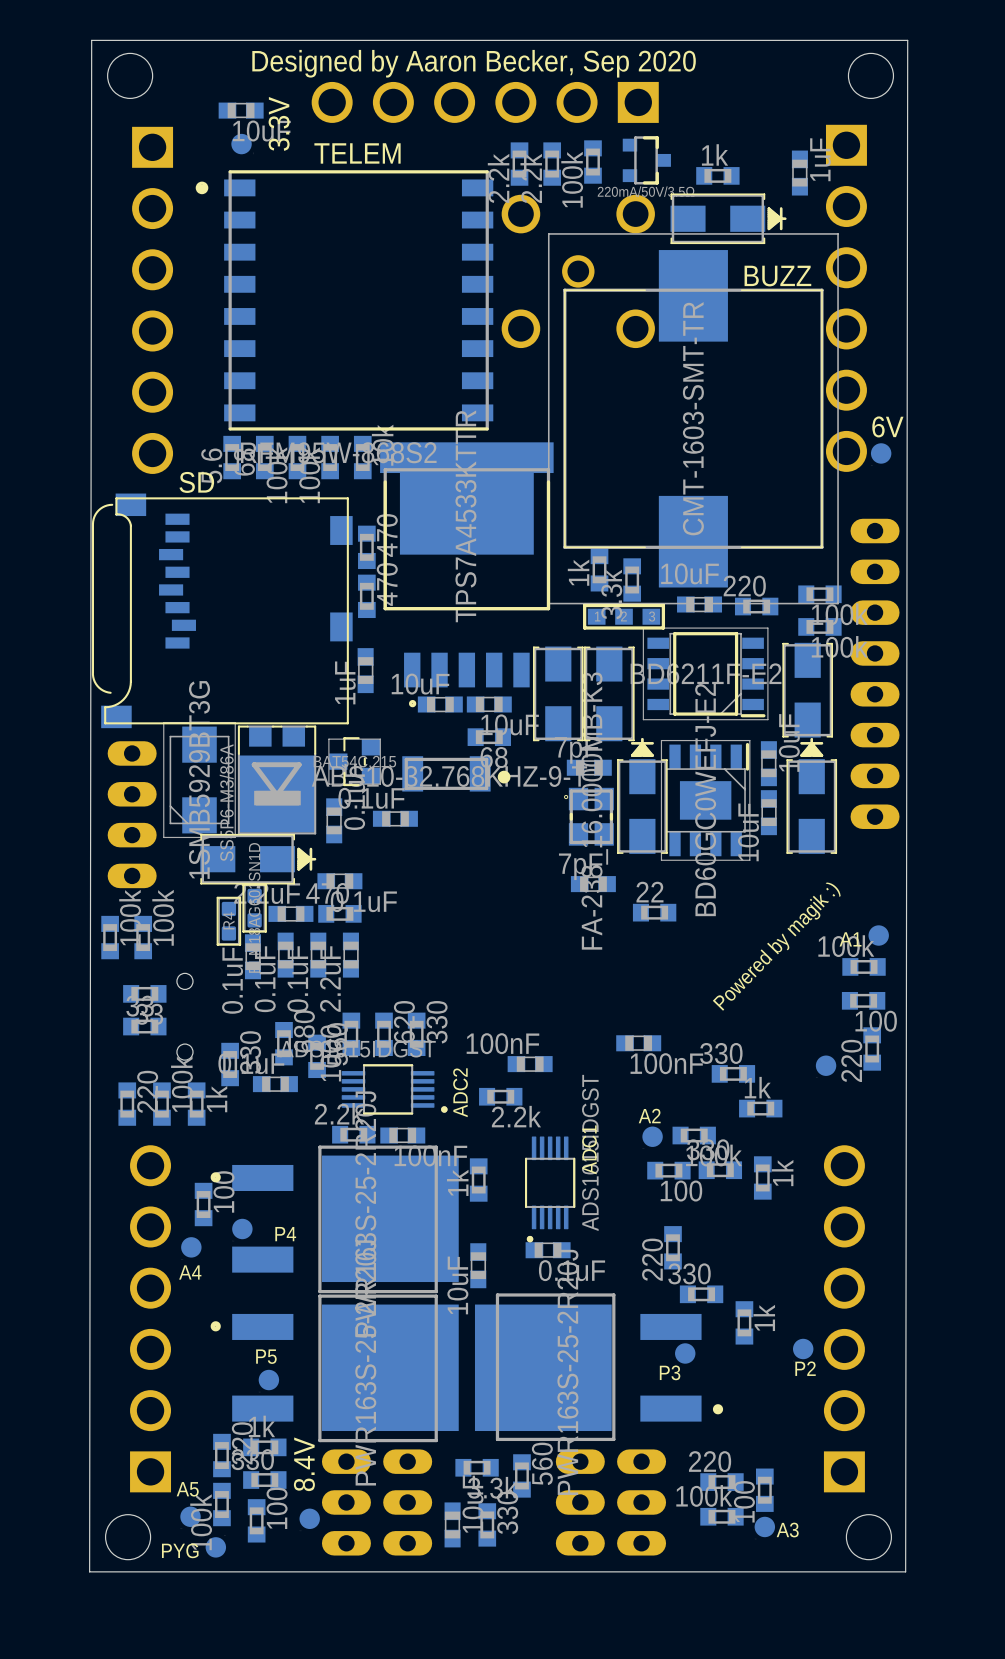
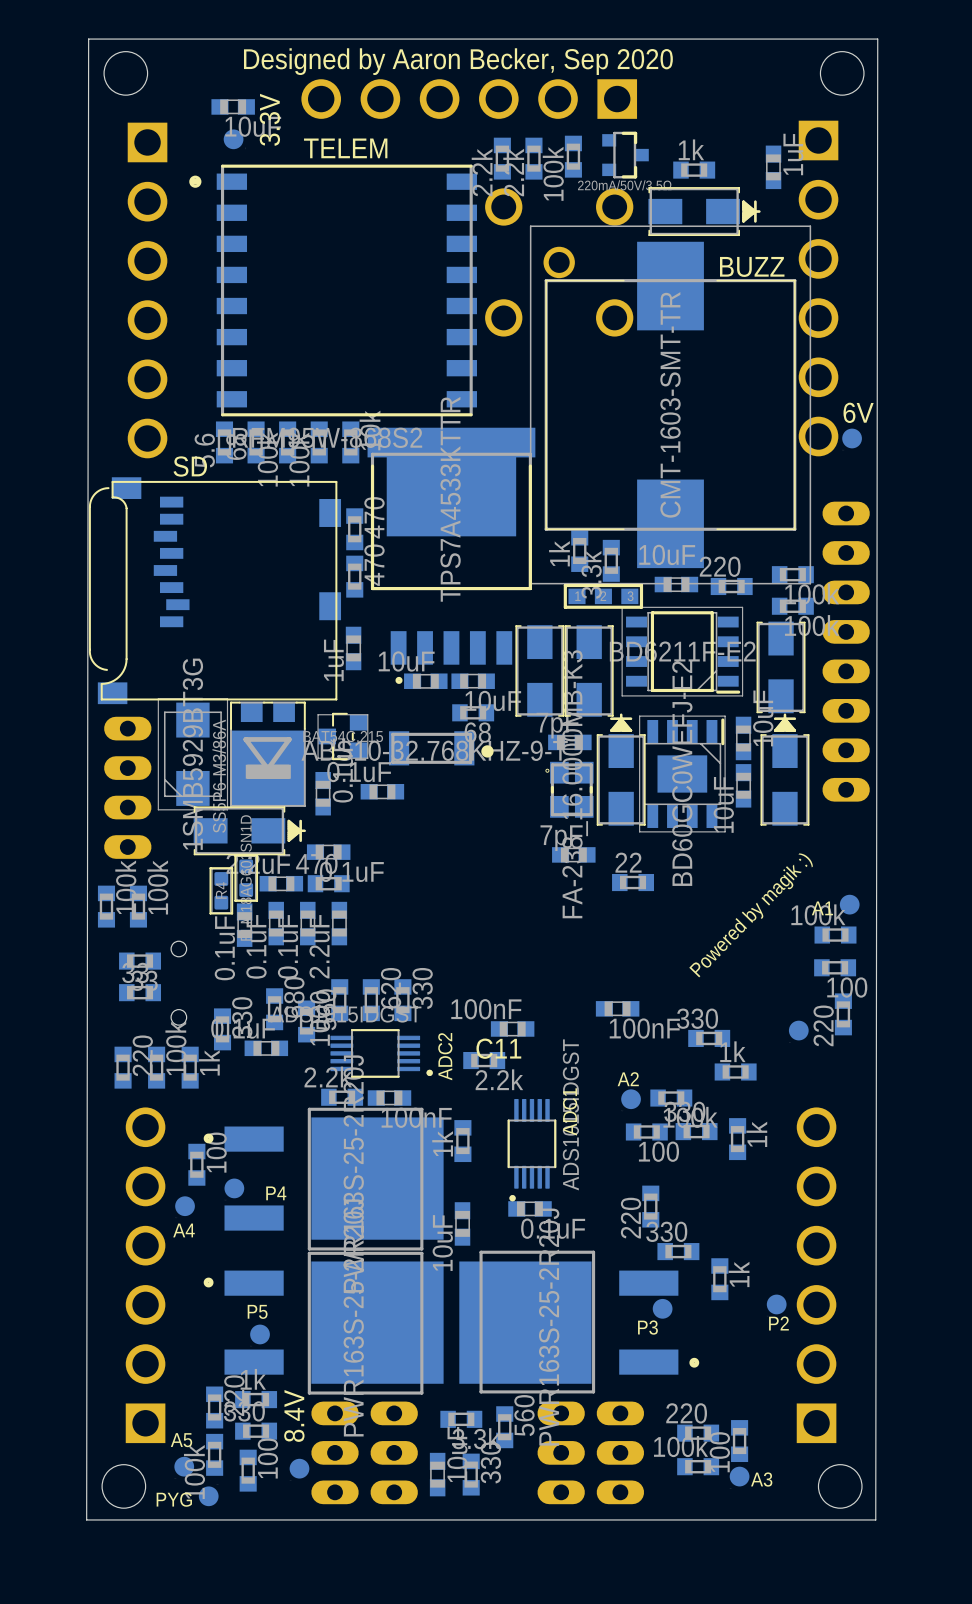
C11 name: none -> C11 (498, 1048)

